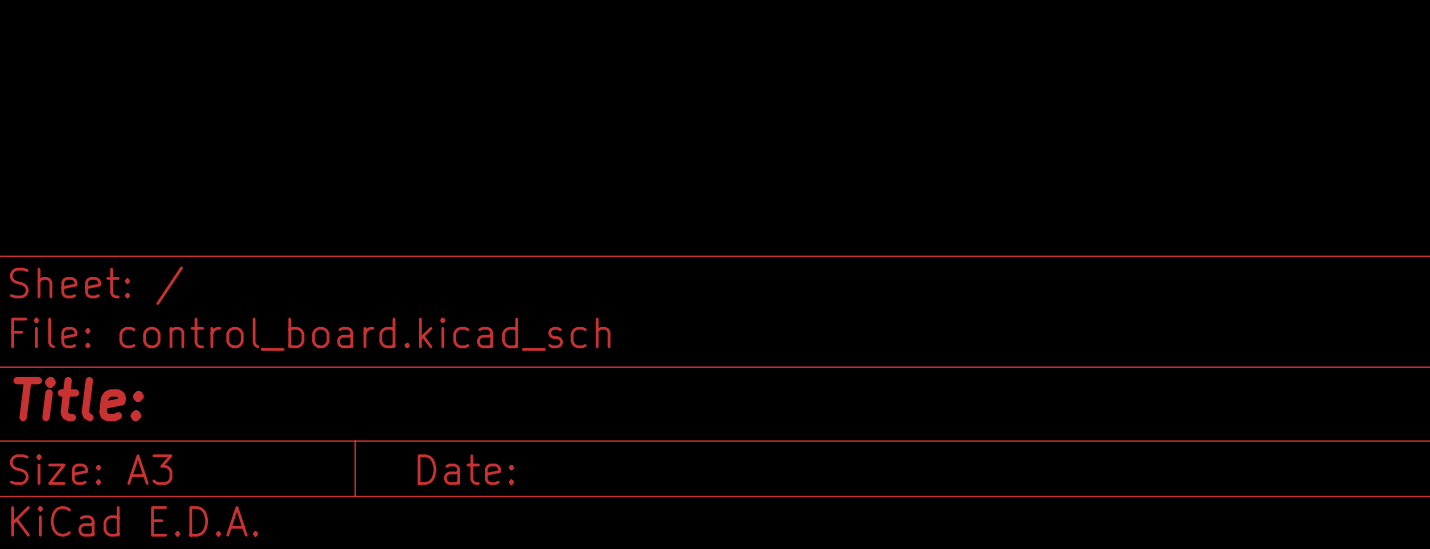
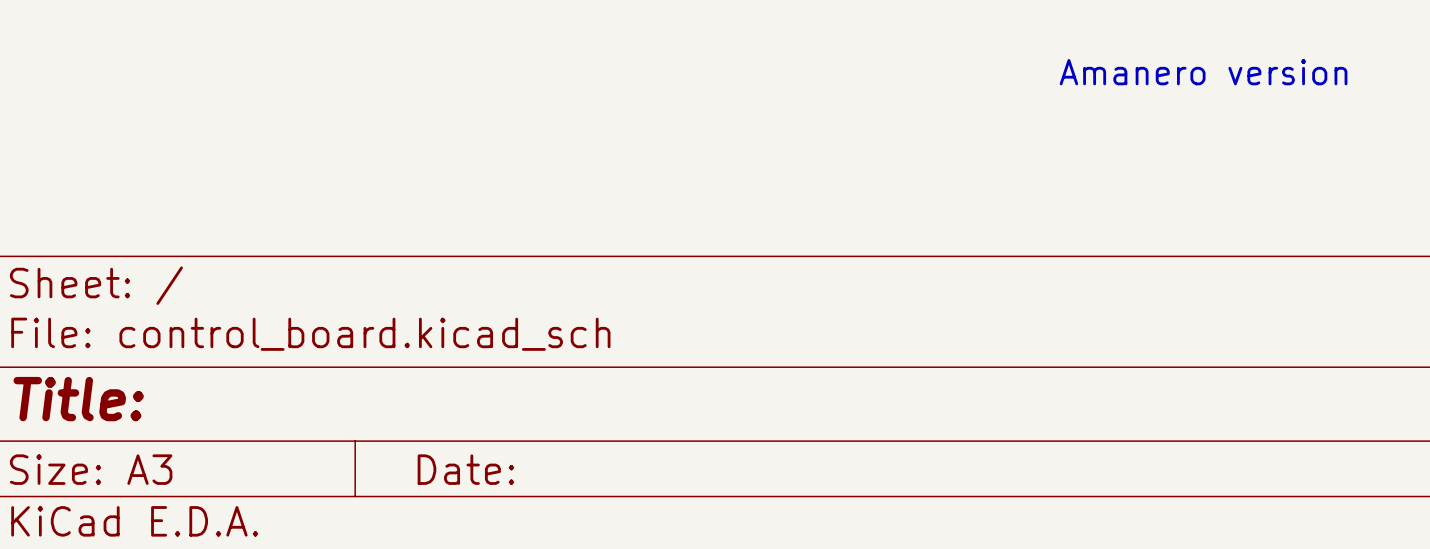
text: none -> Amanero version (1203, 72)

